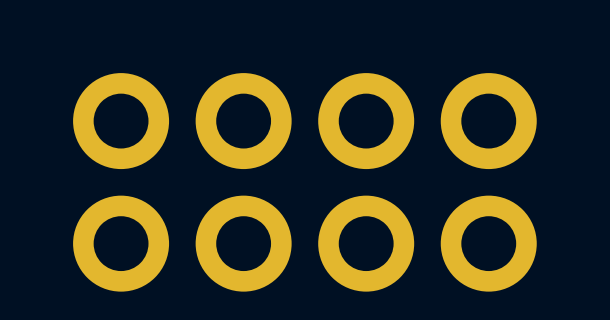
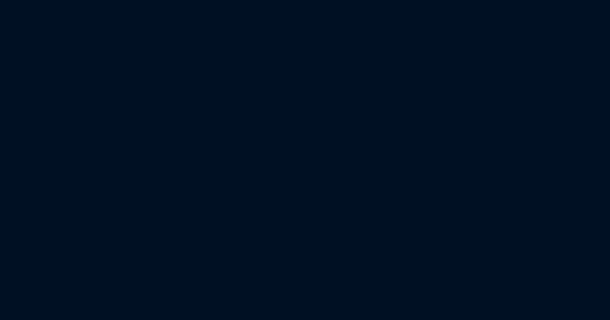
part: (121, 121) -> none
part: (243, 121) -> none
part: (366, 121) -> none
part: (488, 121) -> none
part: (121, 243) -> none
part: (243, 243) -> none
part: (366, 243) -> none
part: (488, 243) -> none

